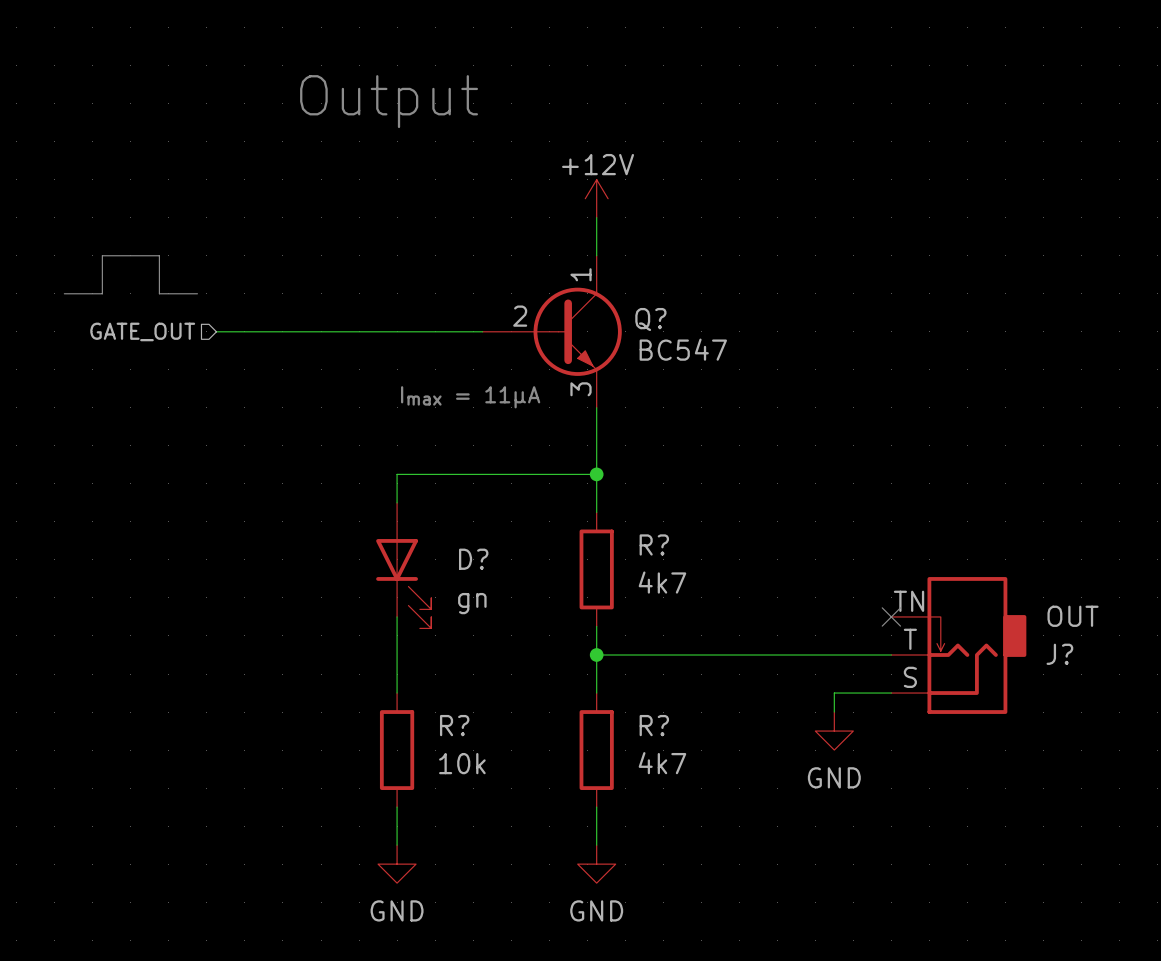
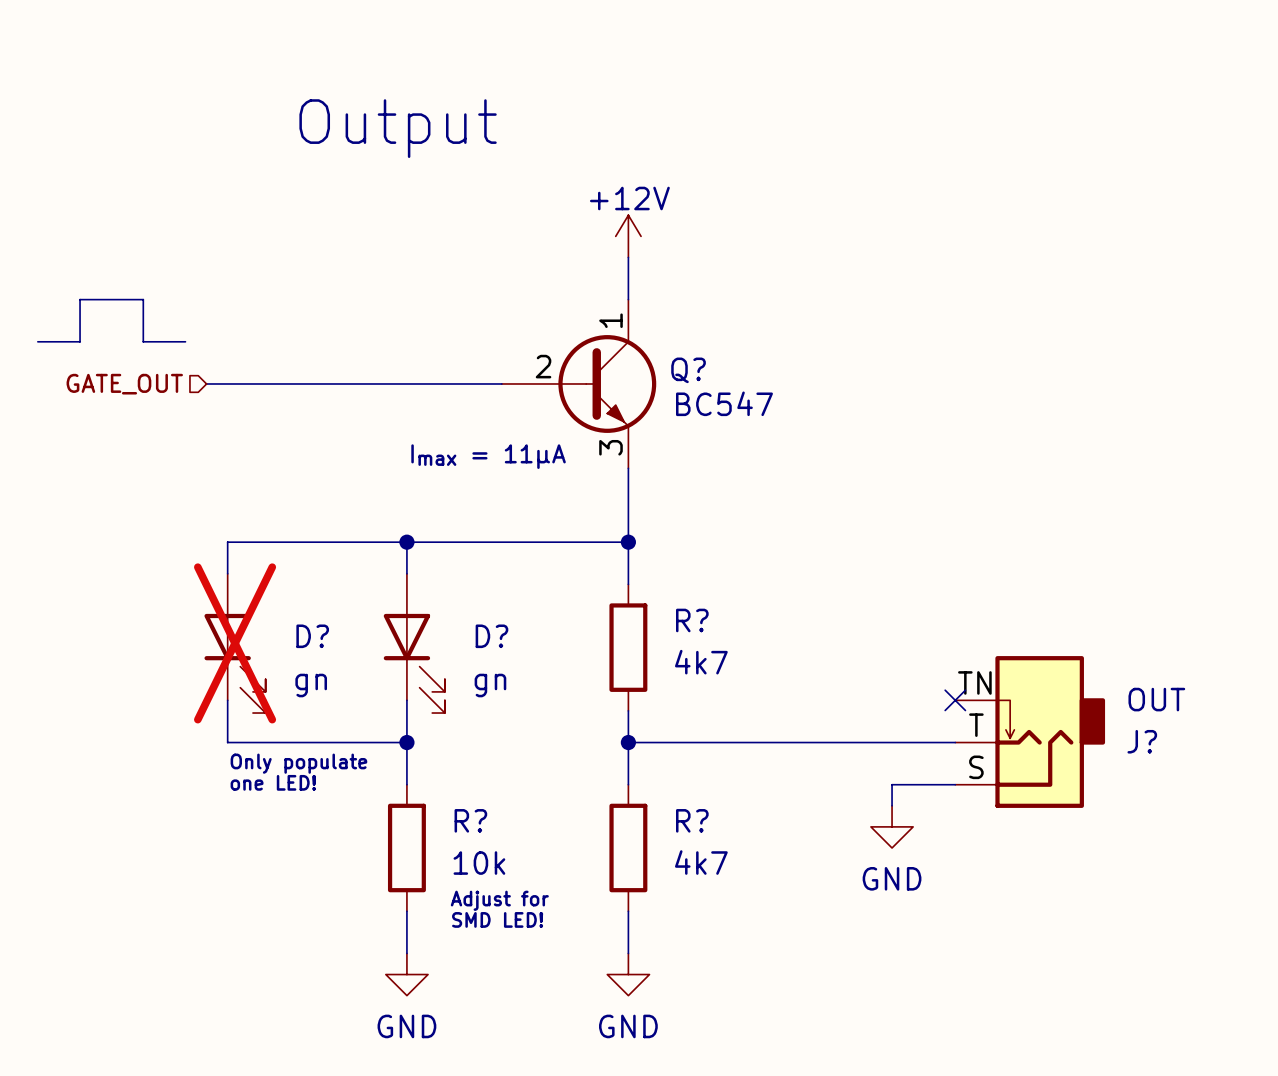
wire: none -> (406, 542) (227, 542) (227, 573)
junction: none -> (406, 542)
D?: none -> gn (235, 643)
wire: none -> (227, 700) (227, 742) (406, 742)
junction: none -> (406, 742)
text: none -> Only populate (298, 763)
text: none -> one LED! (273, 782)
text: none -> Adjust for (499, 900)
text: none -> SMD LED! (497, 919)

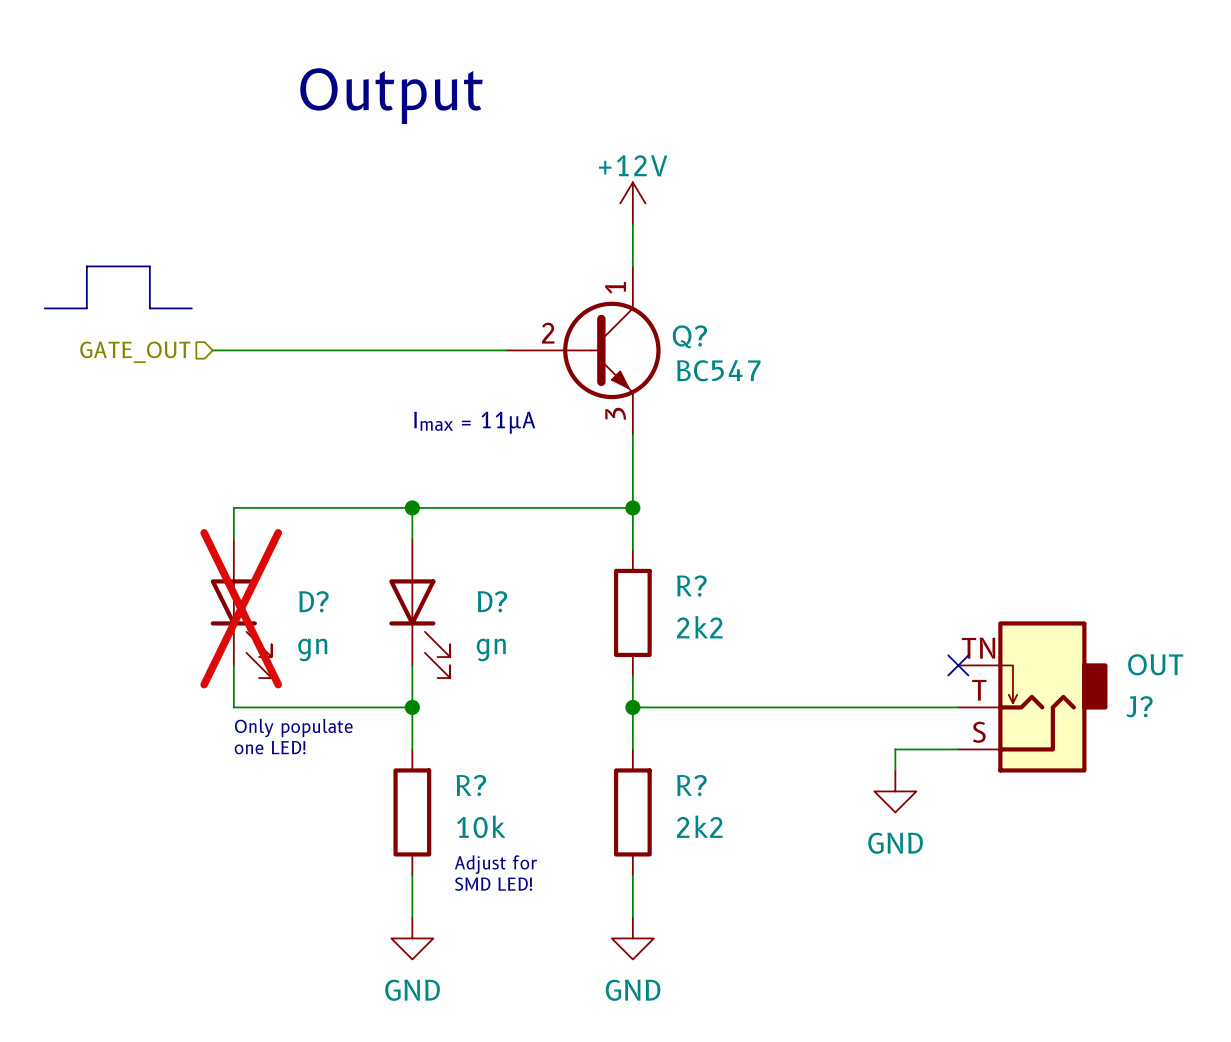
R? value: 4k7 (701, 662) -> 2k2 (699, 627)
R? value: 4k7 (701, 862) -> 2k2 (699, 826)

